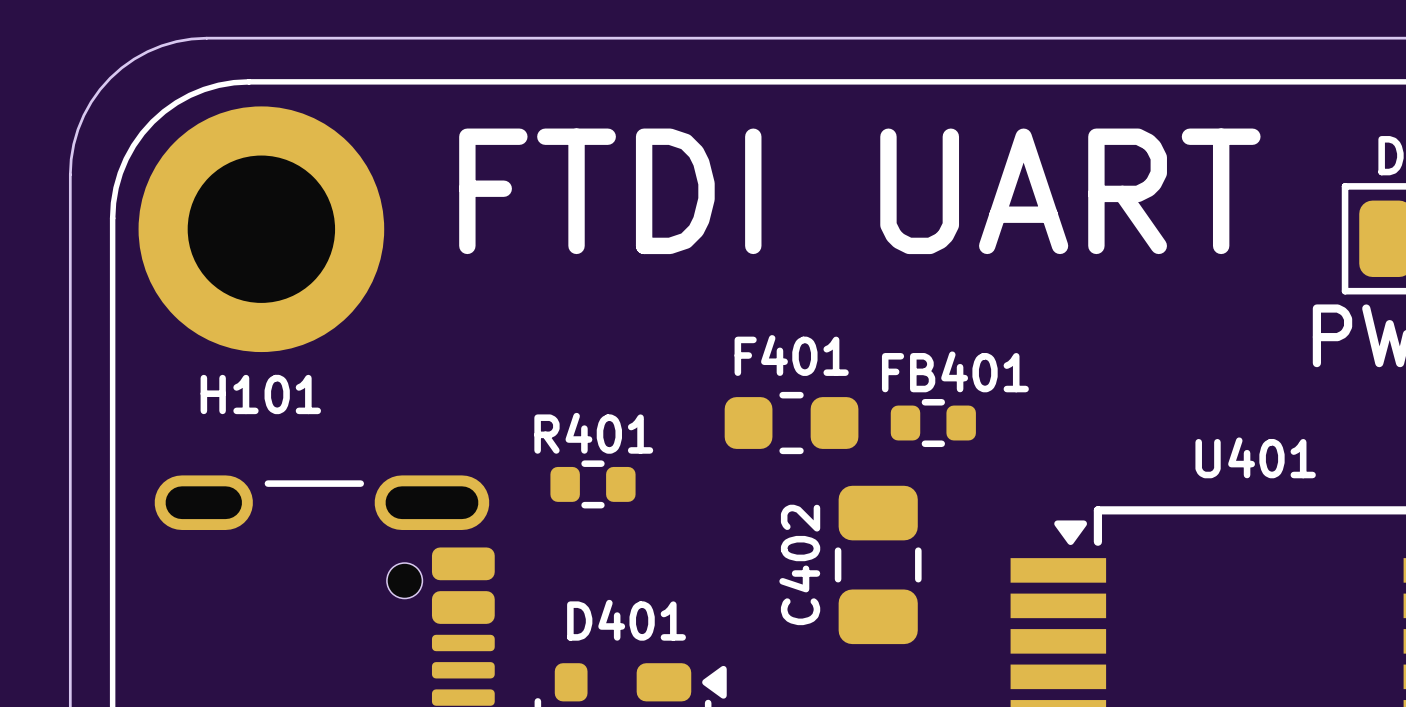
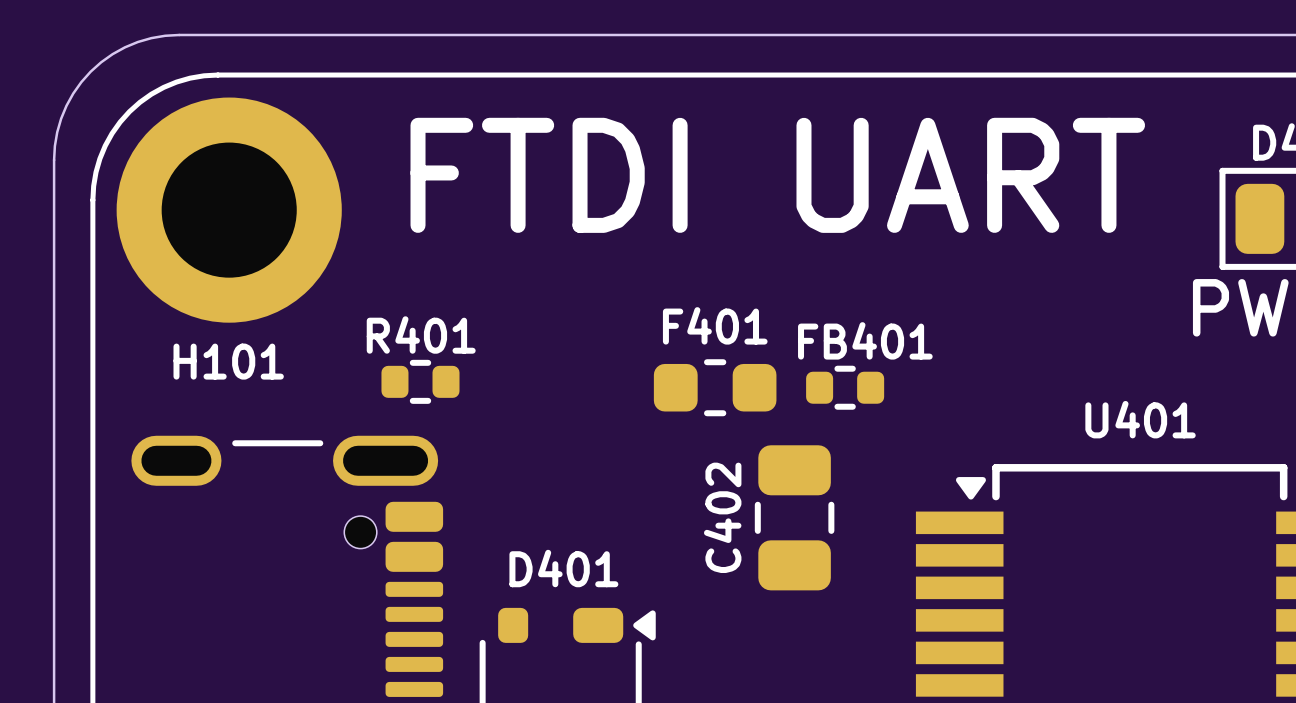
R401 position: (592, 484) -> (420, 381)

